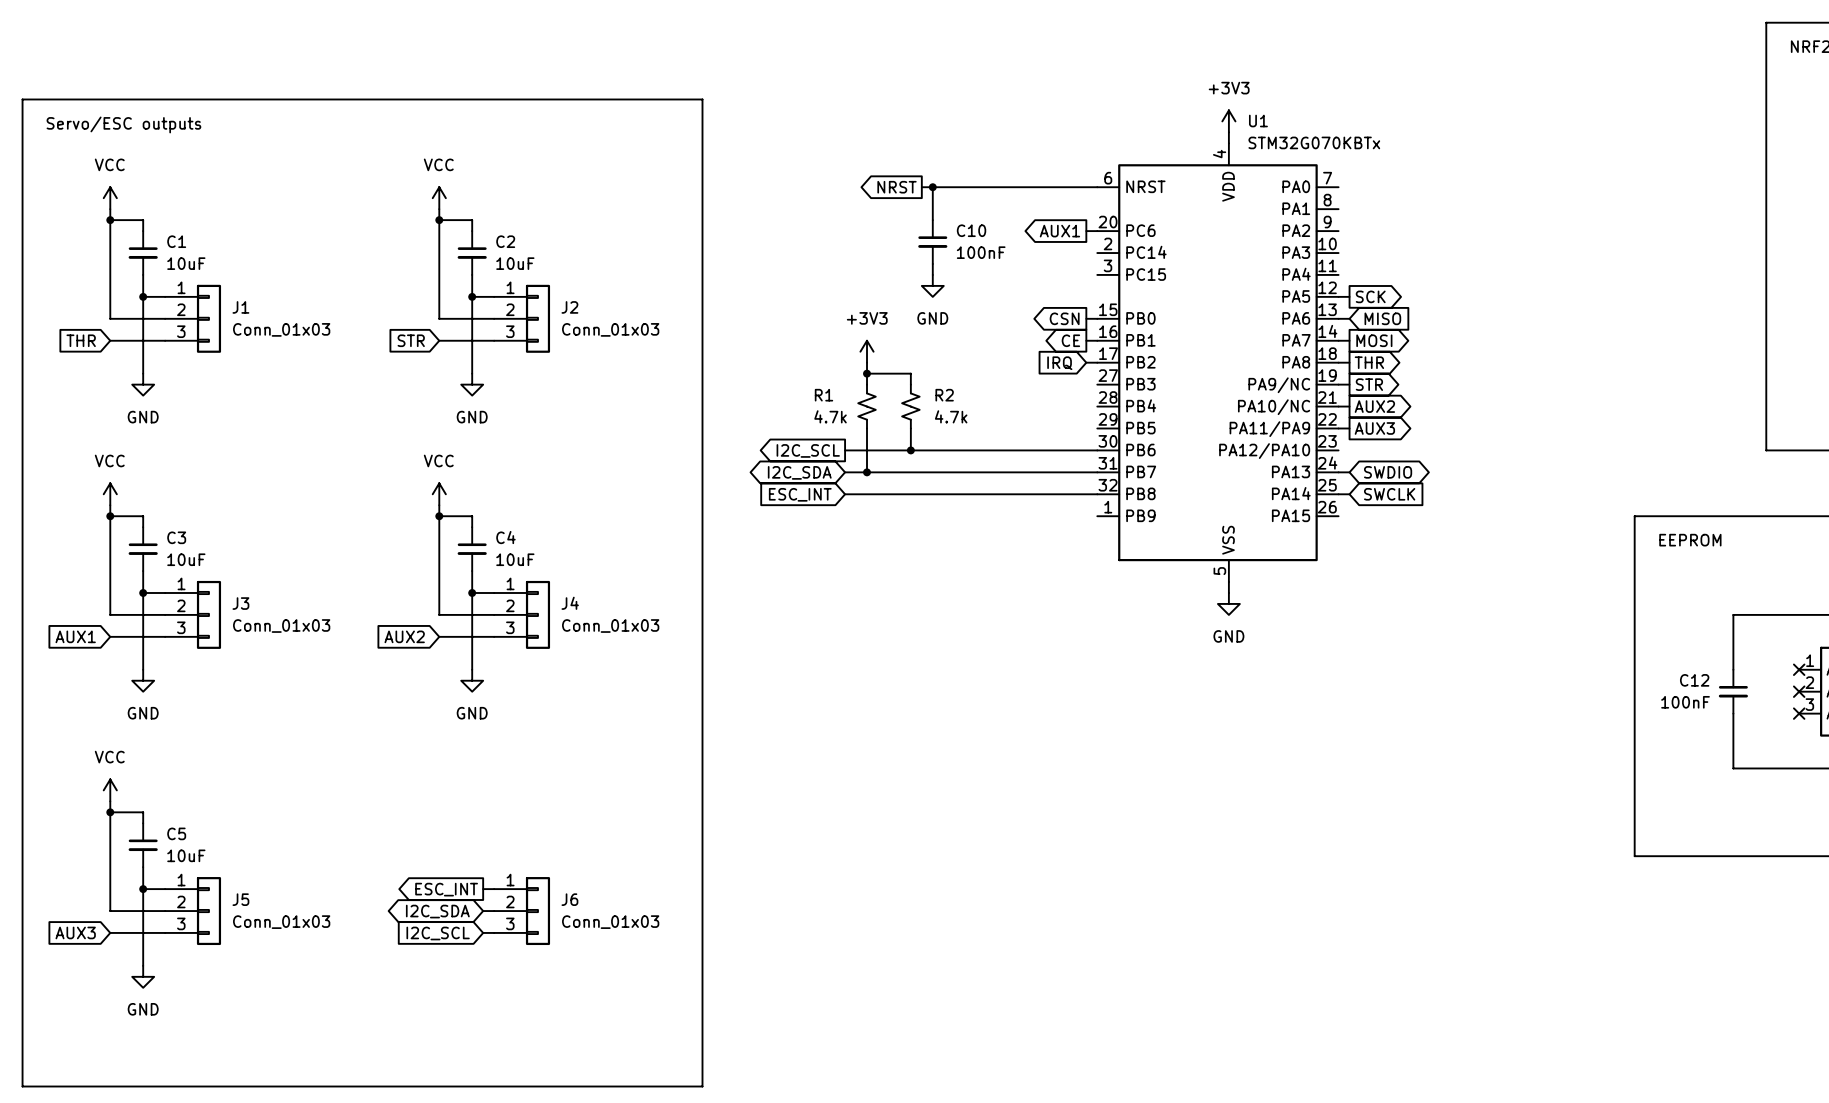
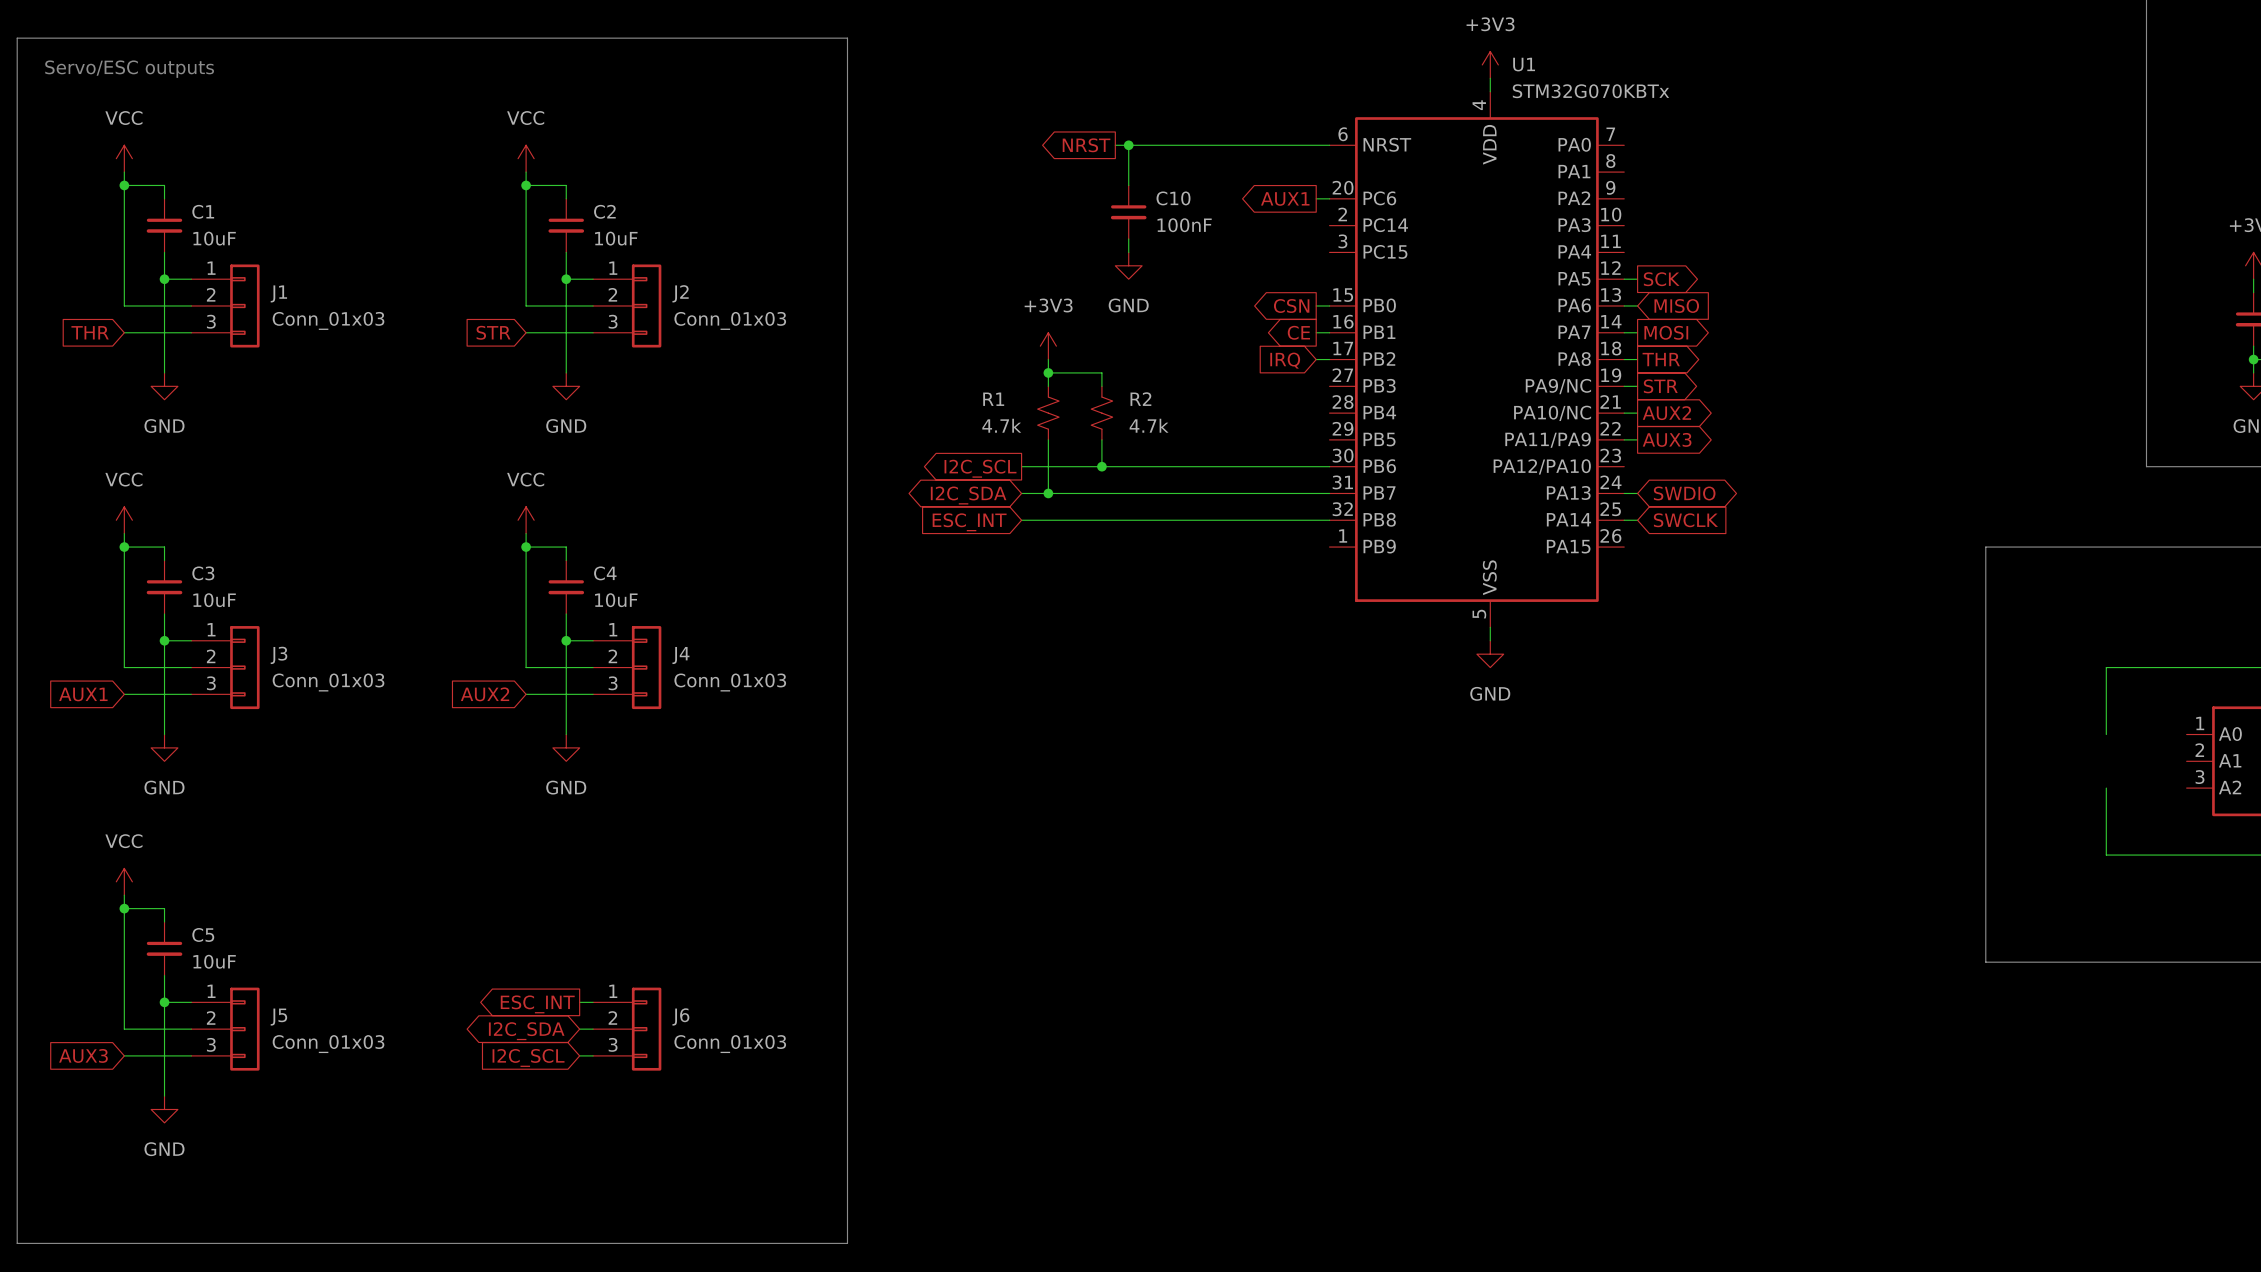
text: EEPROM (1690, 540) -> none
no-connect mark: (1799, 669) -> none
C12: 100nF (1733, 691) -> none
no-connect mark: (1799, 691) -> none
no-connect mark: (1799, 713) -> none

